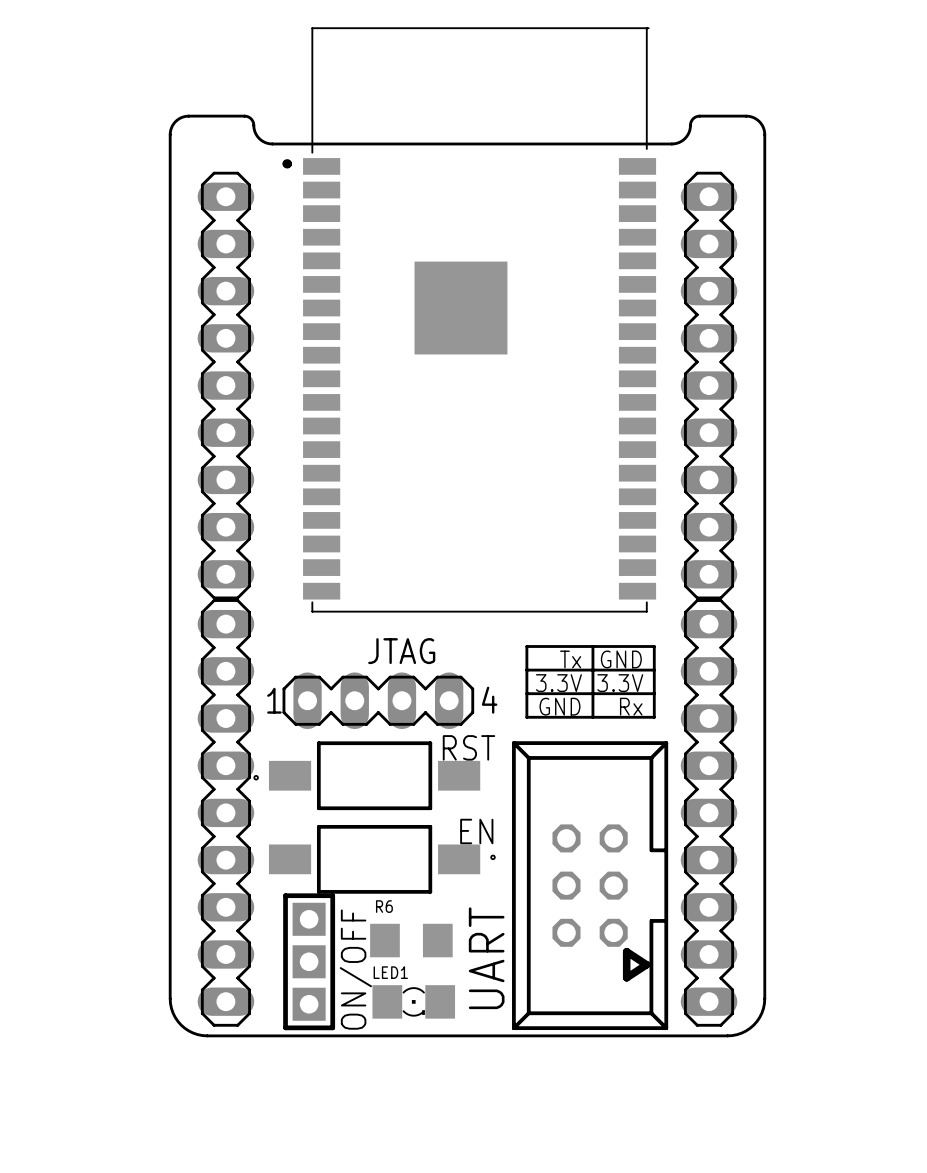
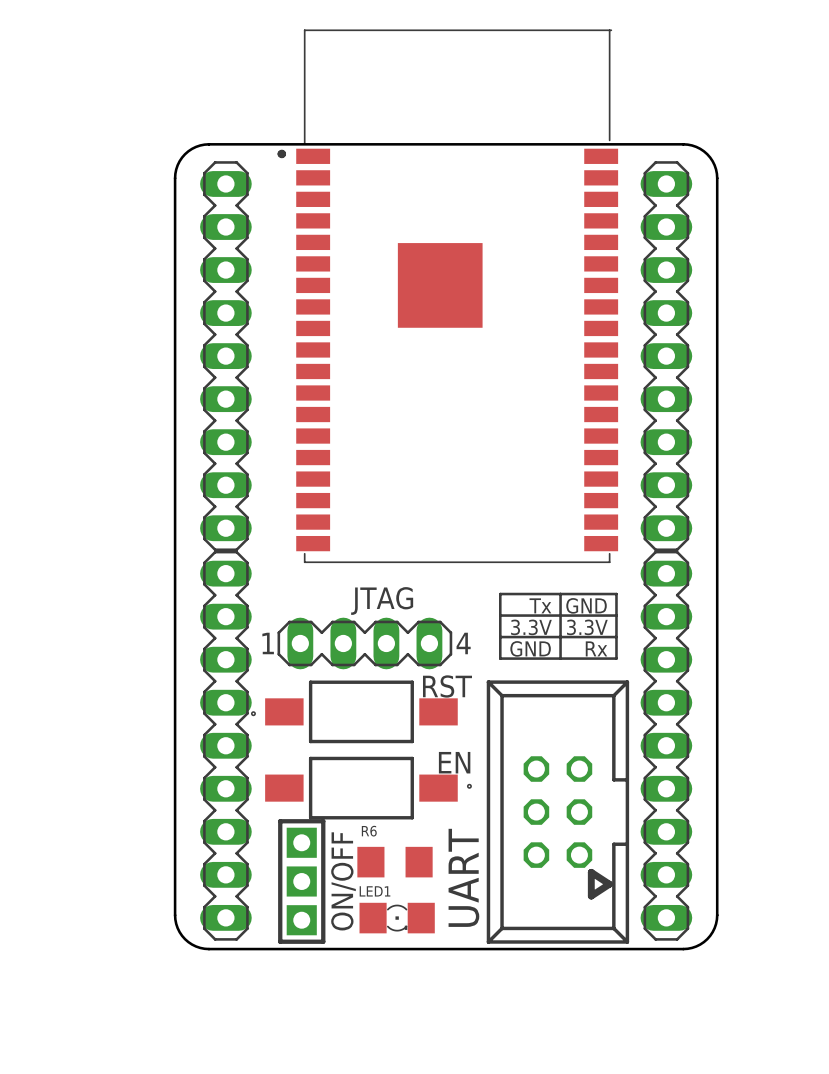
board edge: (170, 190) (170, 129) (177, 119) (188, 116) (246, 116) (252, 120) (255, 132) (259, 138) (272, 143) (671, 143) (685, 138) (689, 132) (691, 120) (696, 116) (748, 116) (757, 119) (764, 129) (764, 190) -> (175, 178) (177, 165) (185, 154) (196, 146) (208, 144) (687, 144) (700, 148) (710, 157) (714, 165) (717, 178)

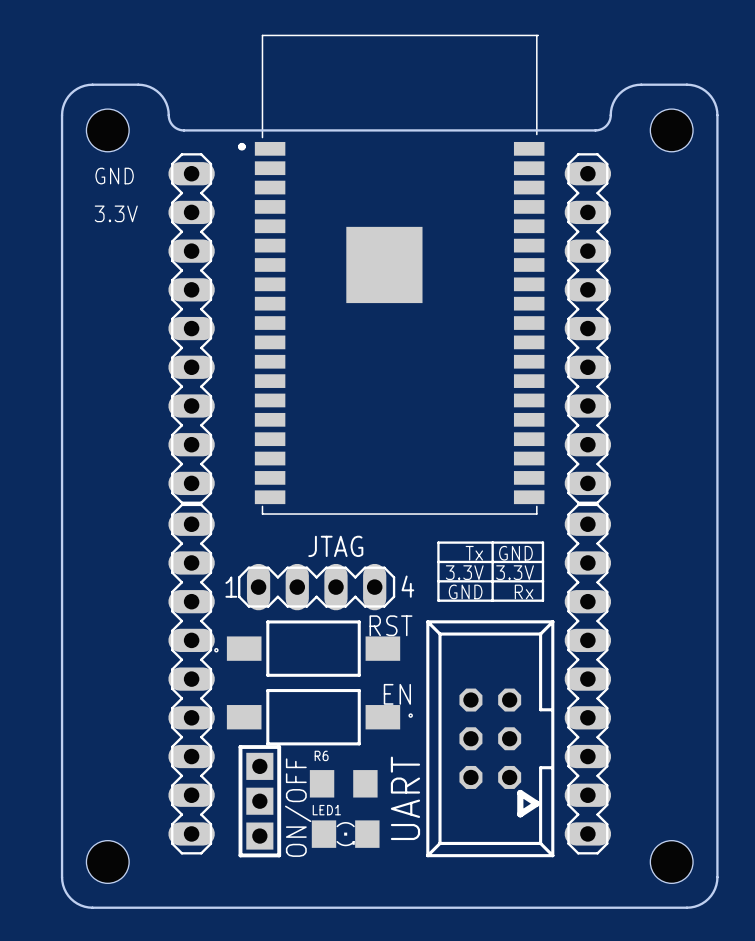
hole: none -> (107, 130)
hole: none -> (671, 130)
board edge: (208, 144) (683, 144) (700, 148) (712, 161) (717, 178) (717, 915) (712, 932) (700, 944) (683, 949) (208, 949) (192, 944) (179, 932) (175, 915) (175, 178) (177, 165) (185, 154) (196, 146) (208, 144) -> (92, 84) (80, 87) (70, 93) (64, 103) (62, 115) (62, 877) (64, 888) (68, 895) (80, 905) (92, 907) (686, 907) (698, 905) (705, 901) (715, 888) (717, 877) (717, 115) (715, 103) (711, 96) (702, 88) (690, 84) (633, 85) (625, 88) (617, 96) (611, 107) (608, 122) (603, 128) (595, 130) (183, 130) (178, 129) (171, 124) (164, 99) (153, 88) (142, 84) (92, 84)
text: none -> GND (114, 176)
text: none -> 3.3V (116, 213)
hole: none -> (107, 862)
hole: none -> (671, 862)

